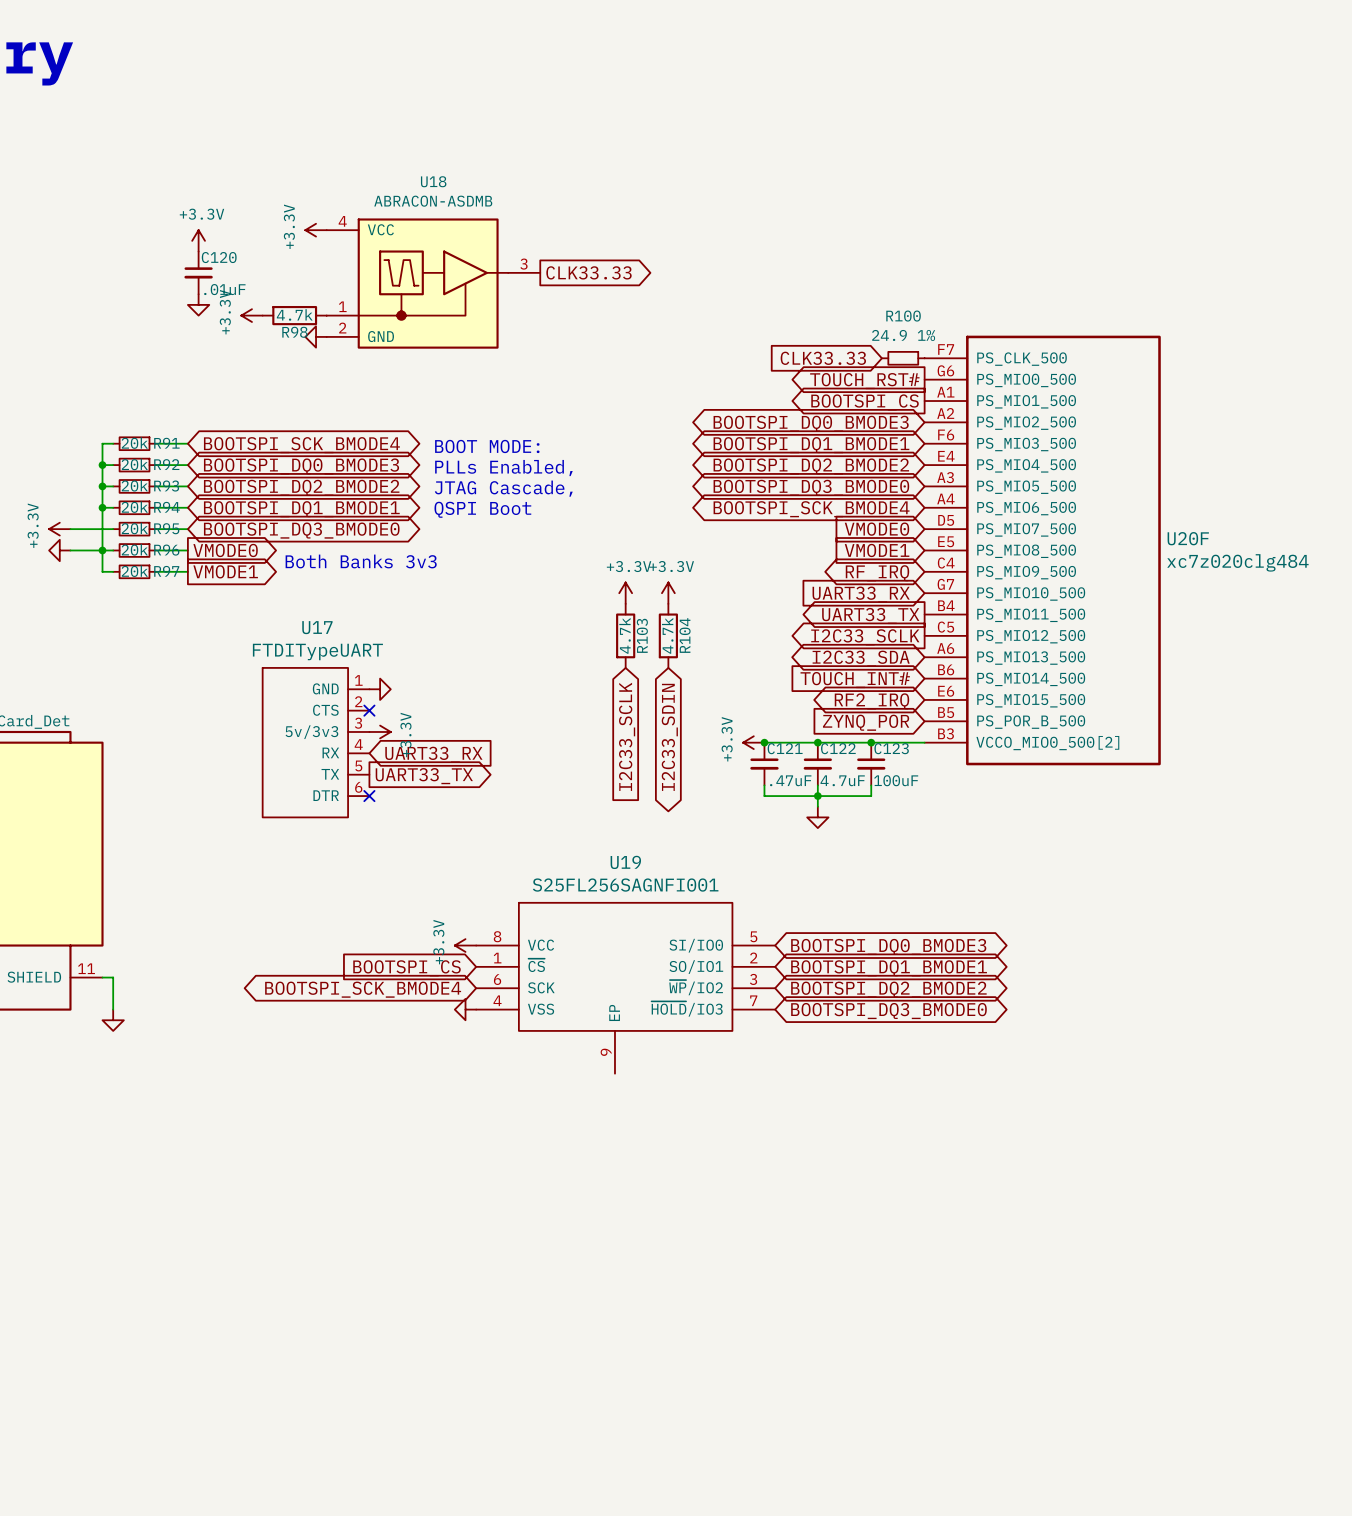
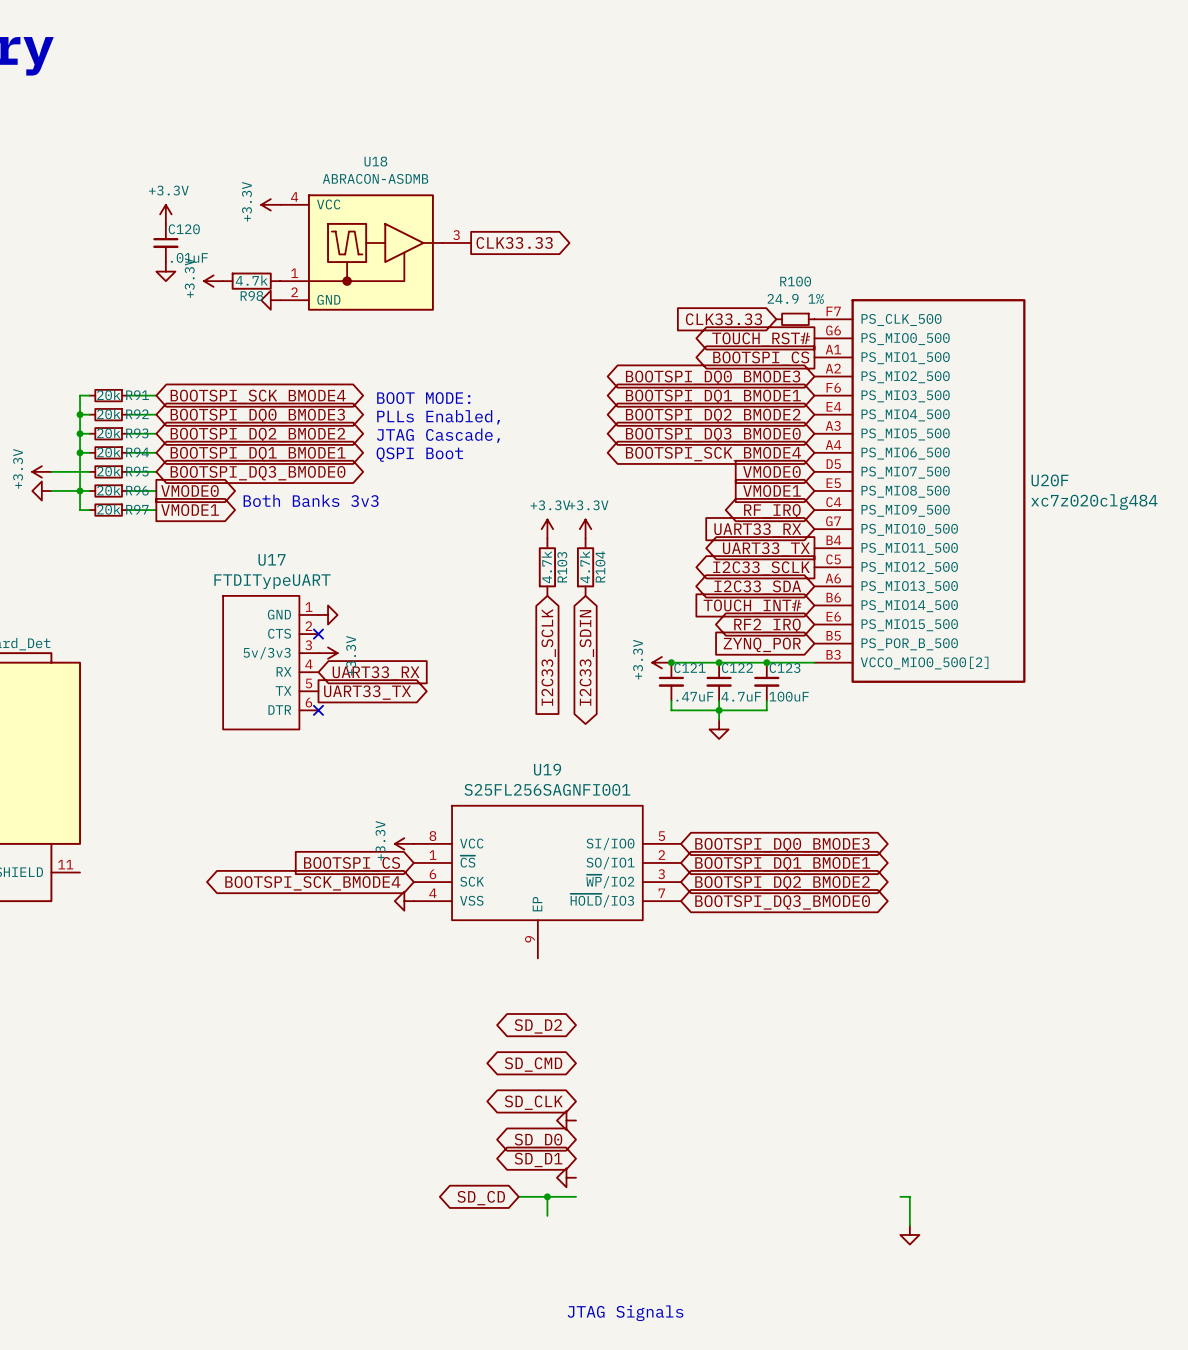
wire: (102, 977) (113, 977) (113, 1009) -> none
power symbol: (113, 1020) -> none
global label: none -> SD_D2 (538, 1026)
global label: none -> SD_CMD (533, 1064)
global label: none -> SD_CLK (533, 1102)
power symbol: none -> (566, 1120)
global label: none -> SD_D0 (538, 1140)
global label: none -> SD_D1 (538, 1159)
power symbol: none -> (566, 1177)
wire: none -> (518, 1196) (576, 1196)
wire: none -> (547, 1196) (547, 1215)
junction: none -> (547, 1196)
wire: none -> (900, 1196) (909, 1196) (909, 1225)
global label: none -> SD_CD (481, 1198)
power symbol: none -> (909, 1234)
text: none -> JTAG Signals (625, 1313)

